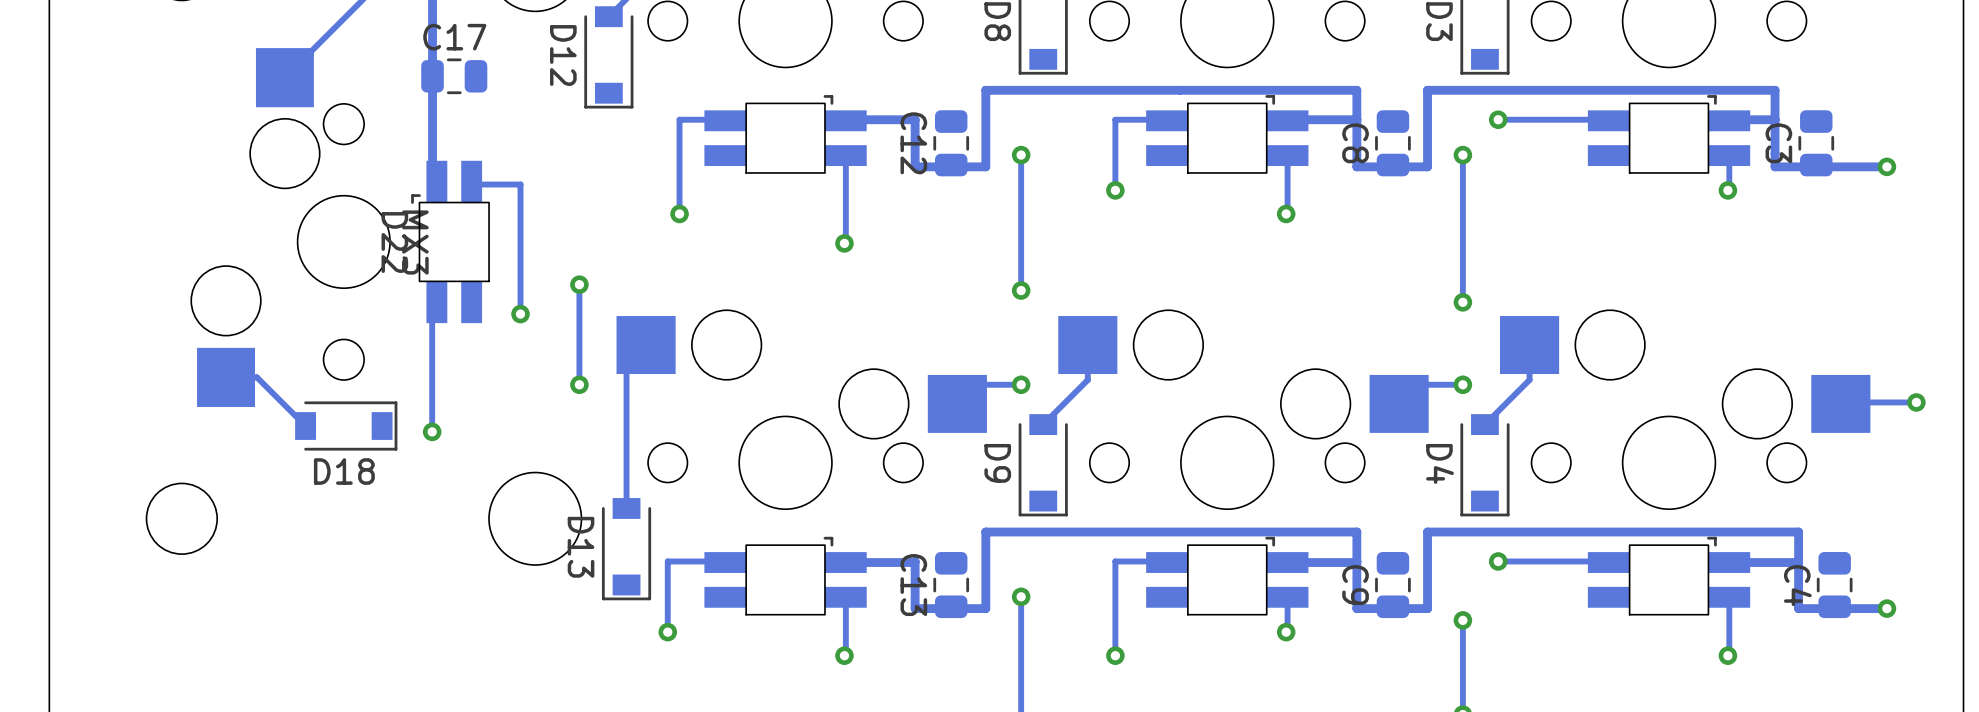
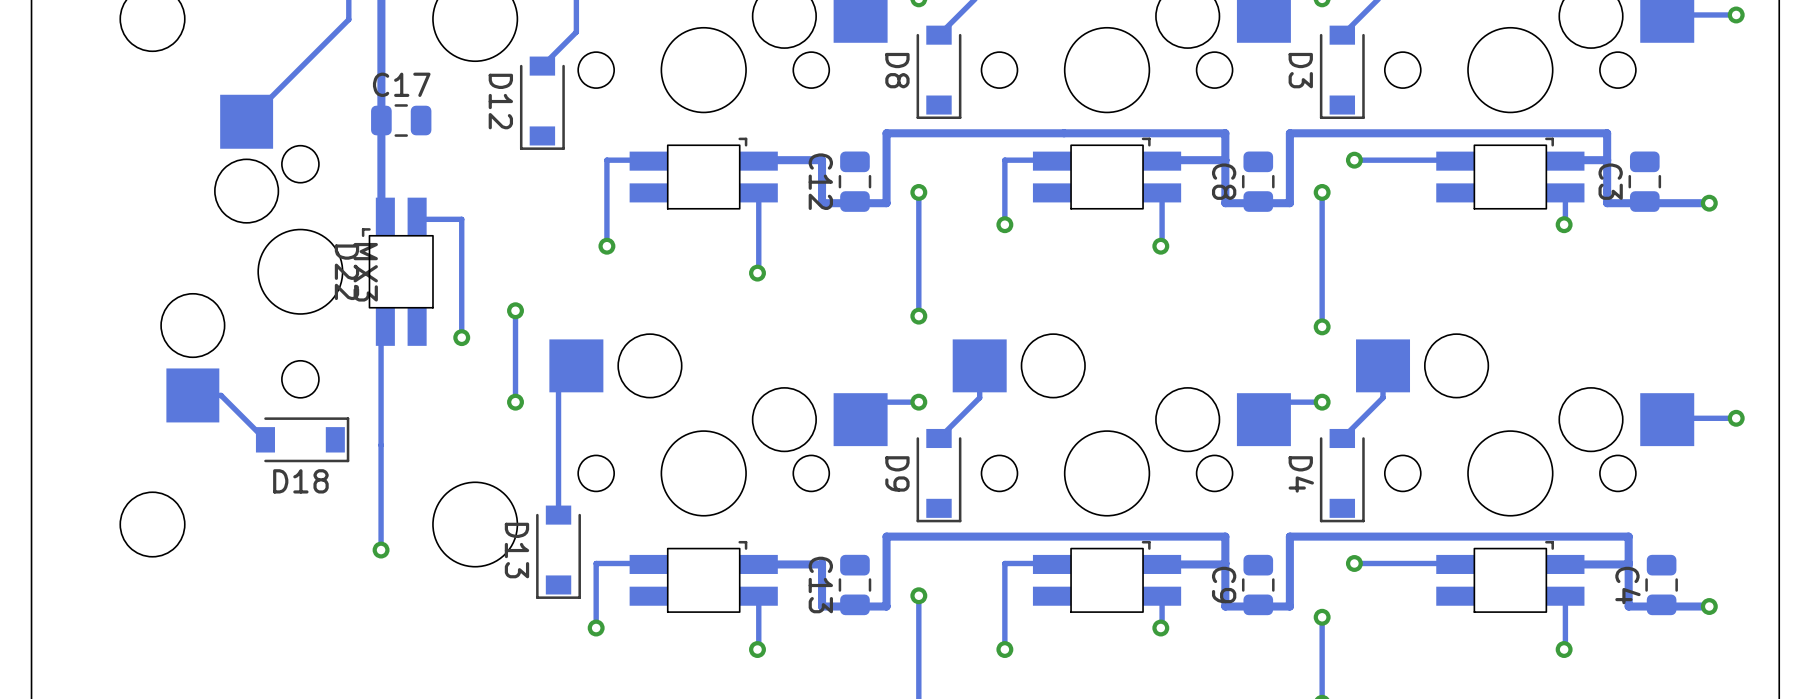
track: none -> (381, 445) (381, 550)
via position: (432, 431) -> (381, 550)

